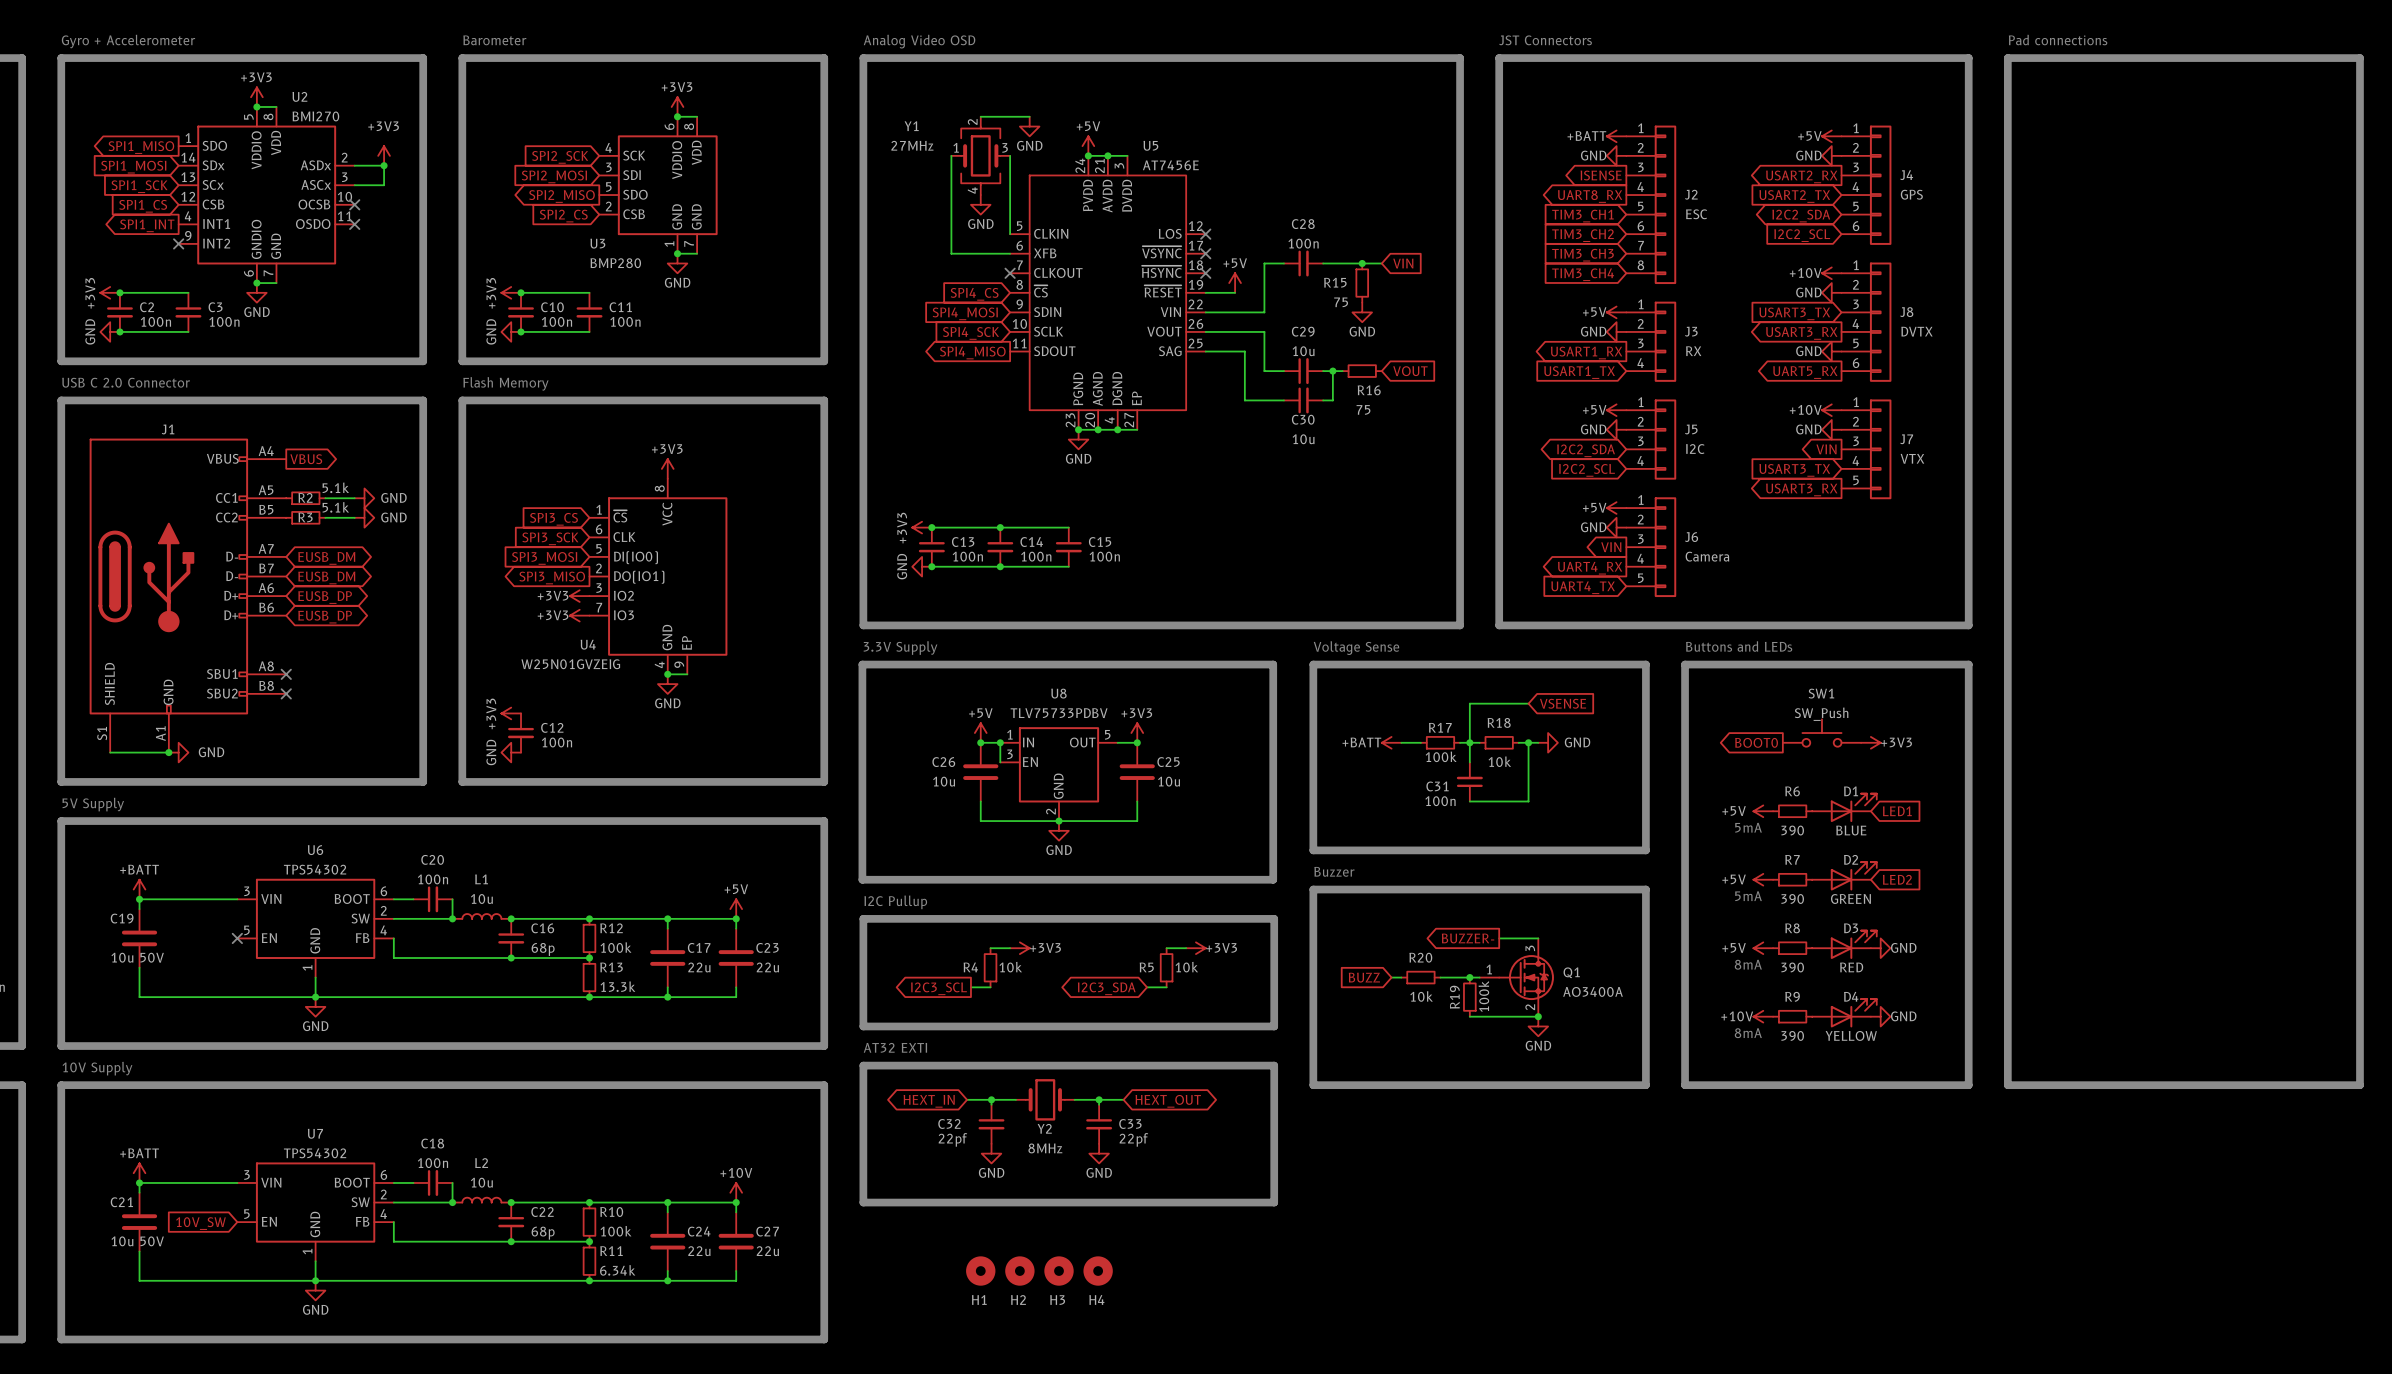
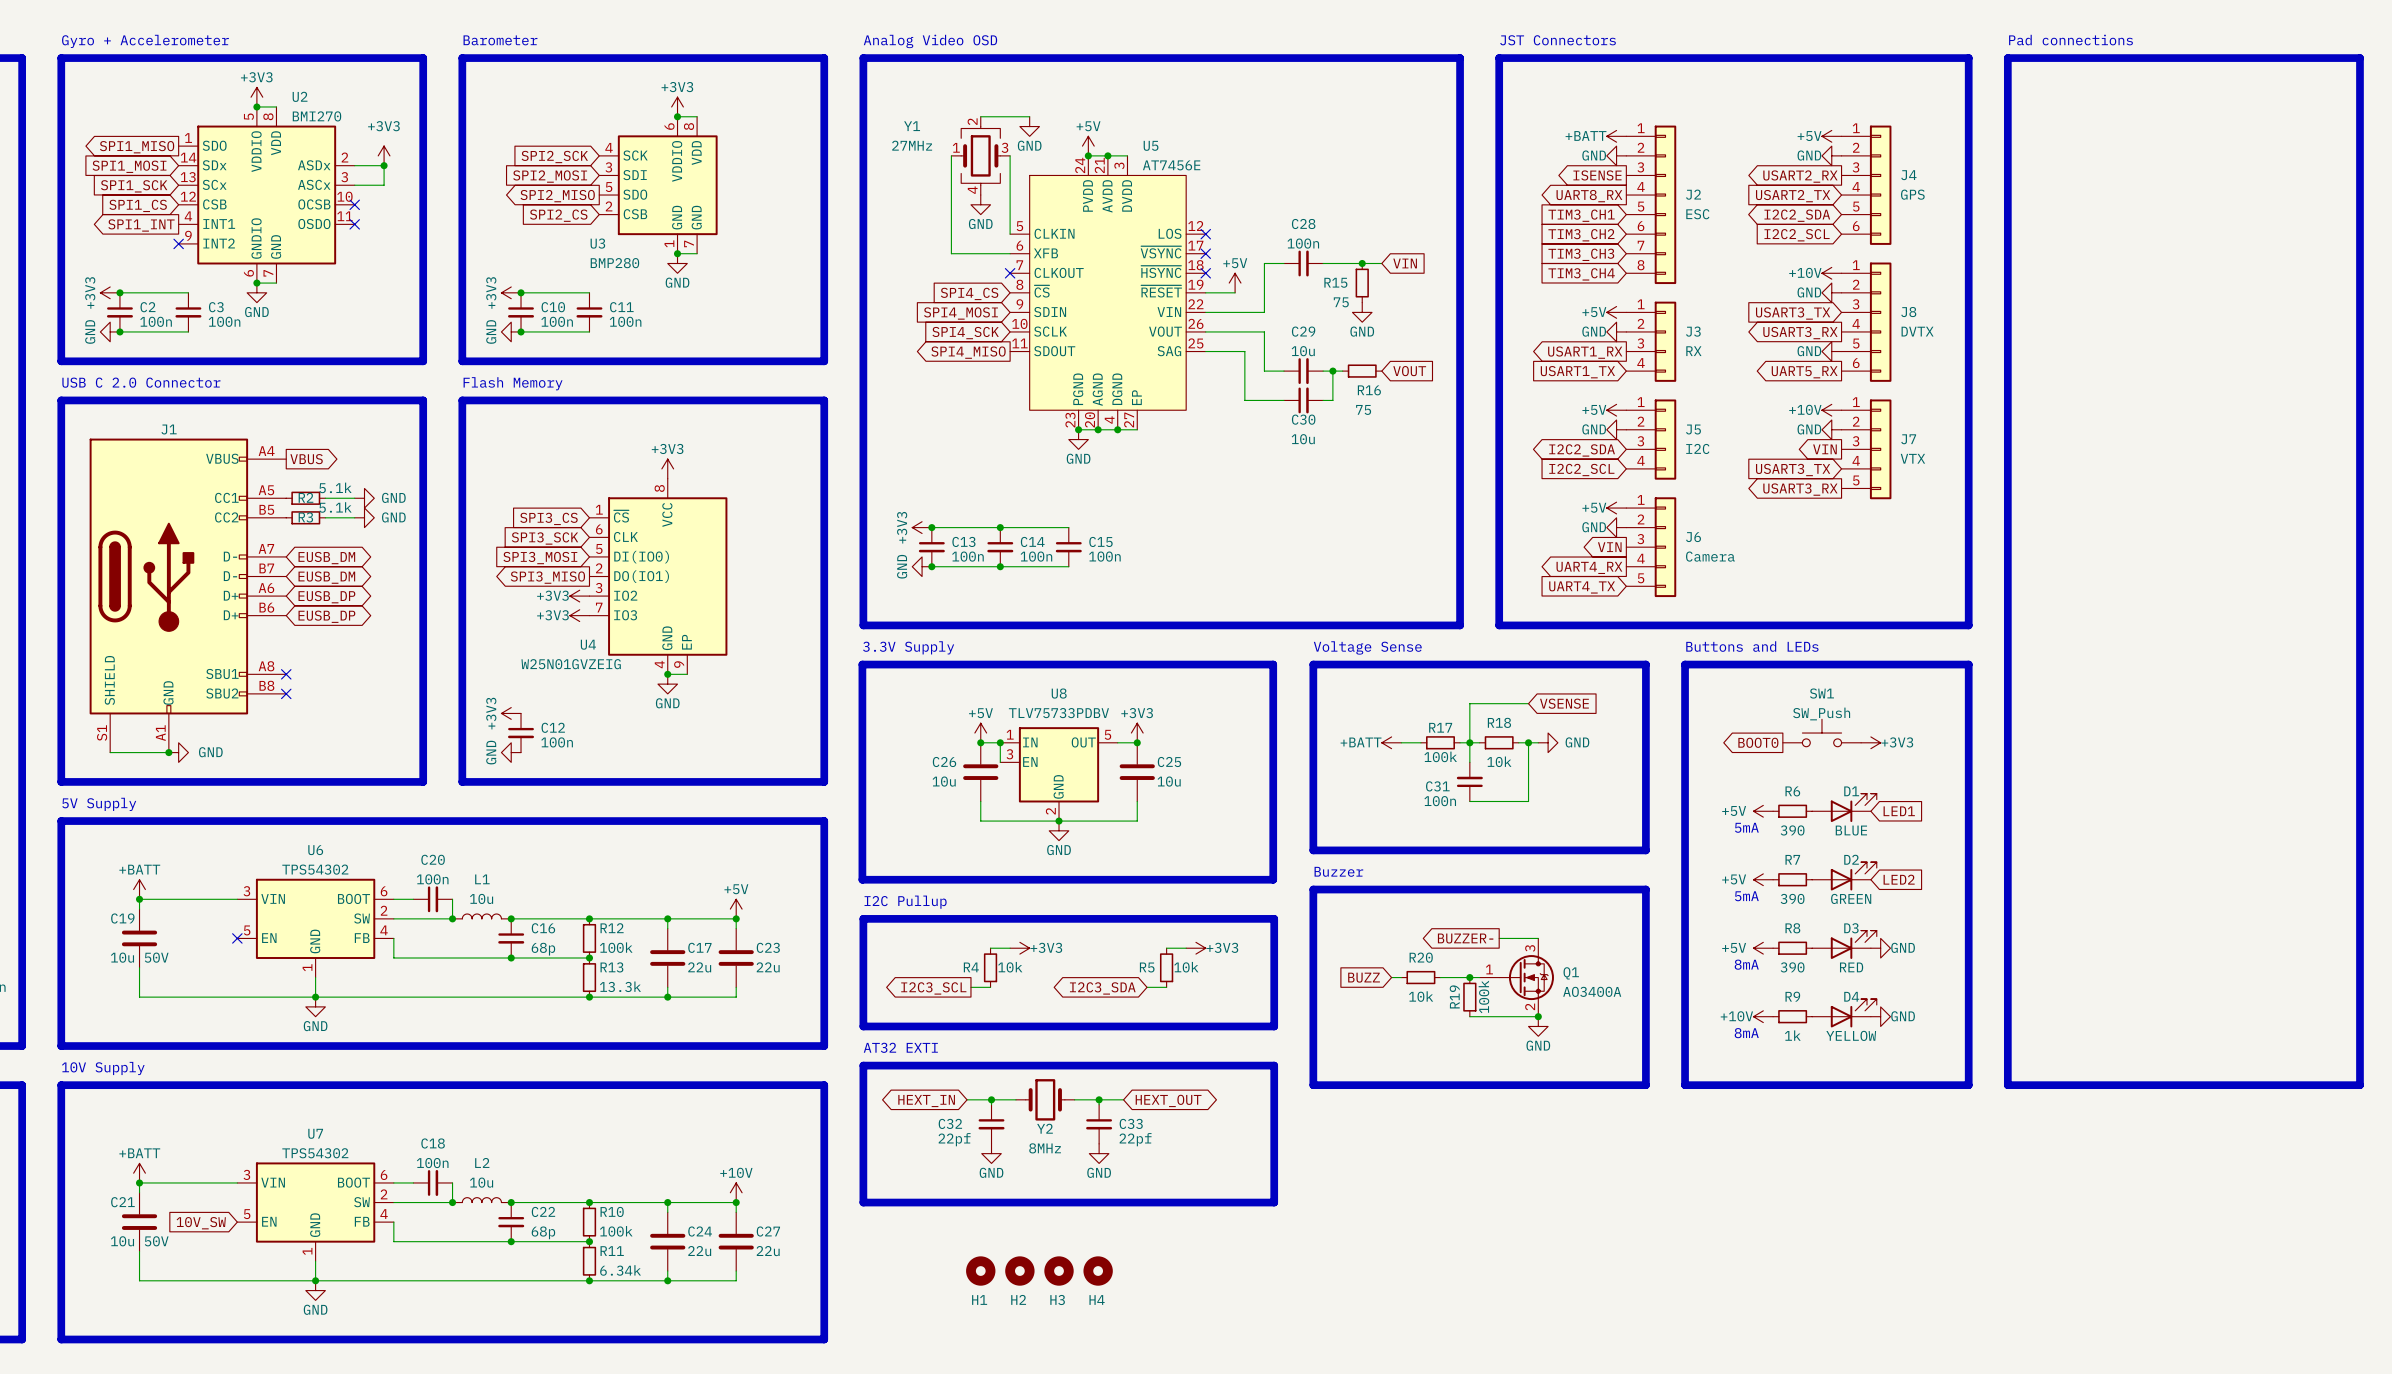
R9 value: 390 (1792, 1035) -> 1k (1792, 1035)

